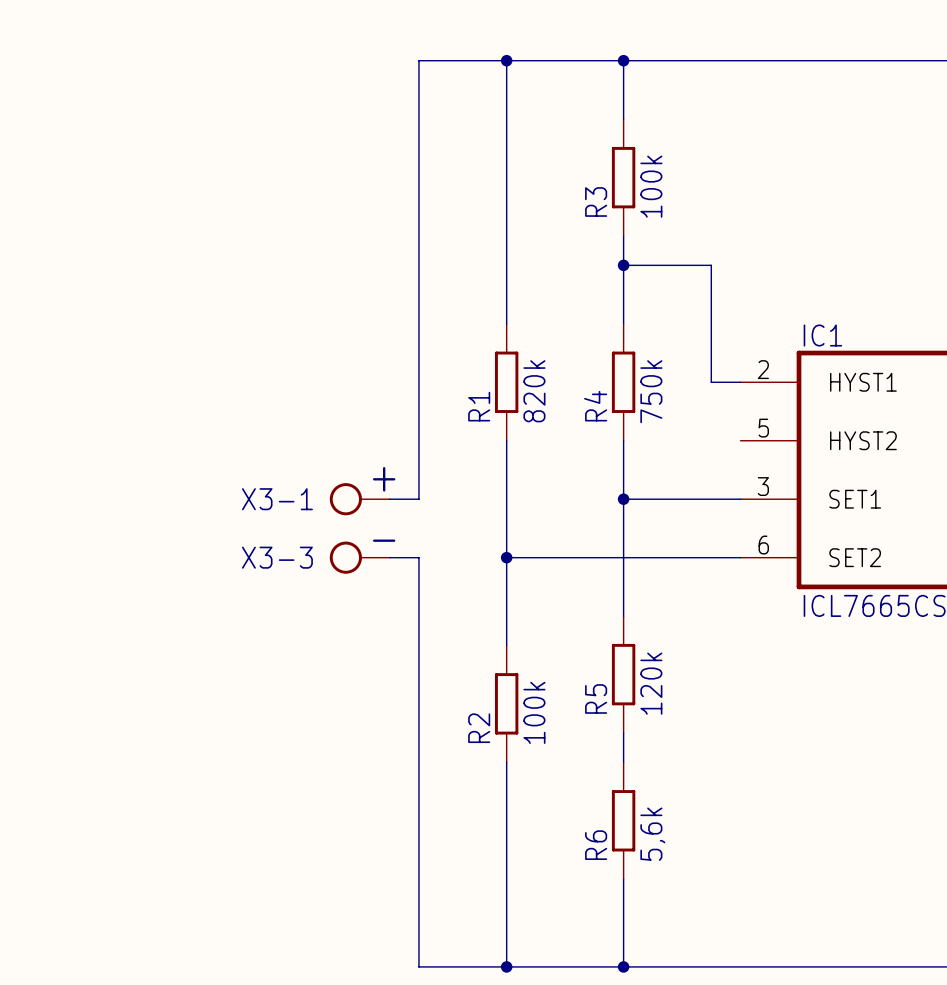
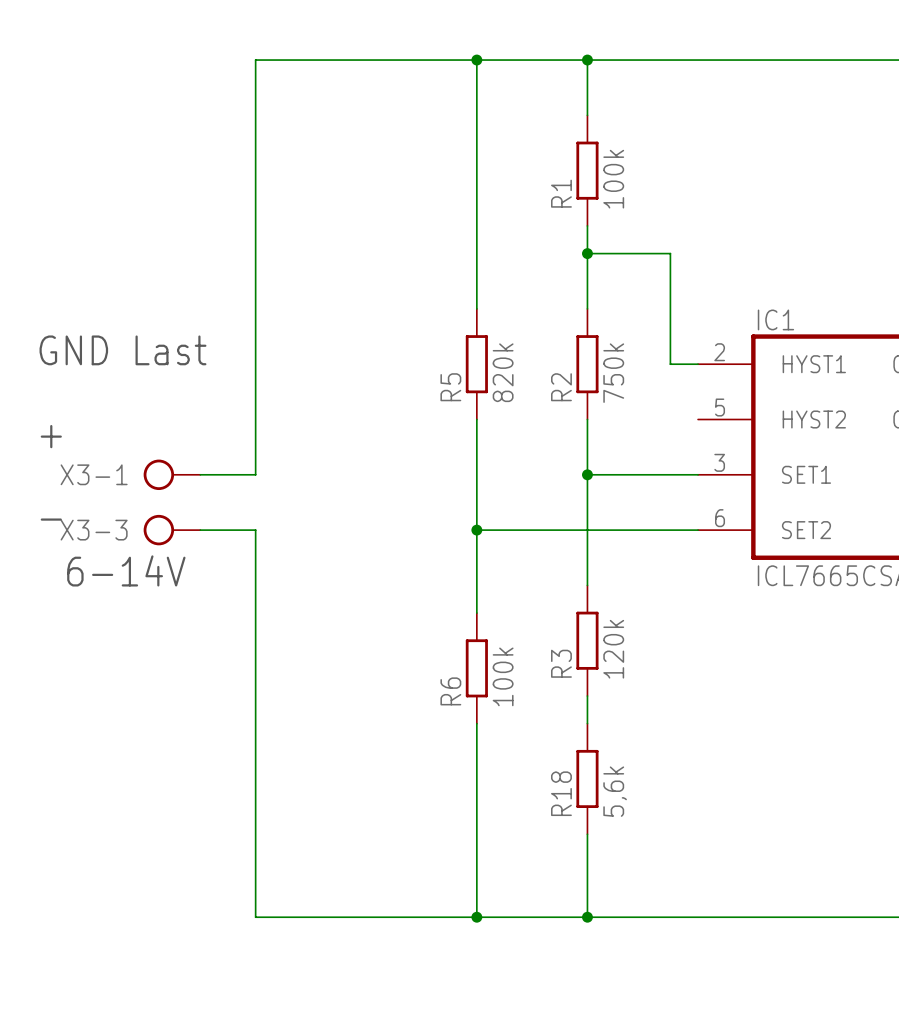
wire: (418, 60) (418, 499) (389, 499) -> (393, 60) (255, 60) (255, 474) (200, 474)
R3 name: R3 (596, 201) -> R1 (561, 193)
text: none -> GND Last (122, 350)
R1 name: R1 (479, 406) -> R5 (450, 387)
R4 name: R4 (595, 406) -> R2 (561, 387)
text: none -> + (51, 436)
text: + (384, 479) -> none
X3-1 position: (359, 499) -> (171, 474)
text: - (384, 540) -> none
text: none -> - (51, 519)
X3-3 position: (359, 557) -> (171, 530)
wire: (389, 557) (418, 557) (418, 966) -> (200, 530) (255, 530) (255, 917) (393, 917)
text: none -> 6-14V (126, 570)
R5 name: R5 (596, 698) -> R3 (561, 663)
R2 name: R2 (479, 728) -> R6 (450, 691)
R6 name: R6 (596, 845) -> R18 (561, 793)

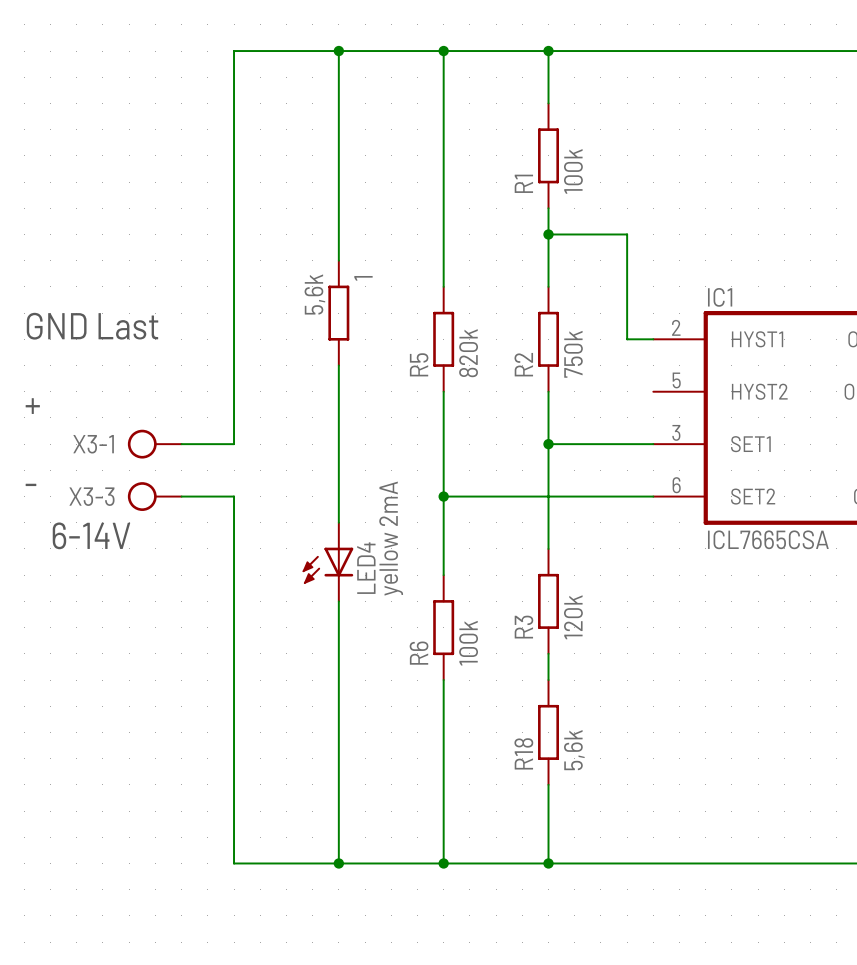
wire: none -> (338, 51) (338, 260)
junction: none -> (338, 51)
1: none -> 5,6k (338, 313)
wire: none -> (338, 365) (338, 522)
LED4: none -> yellow 2mA (327, 562)
wire: none -> (338, 601) (338, 863)
junction: none -> (338, 863)

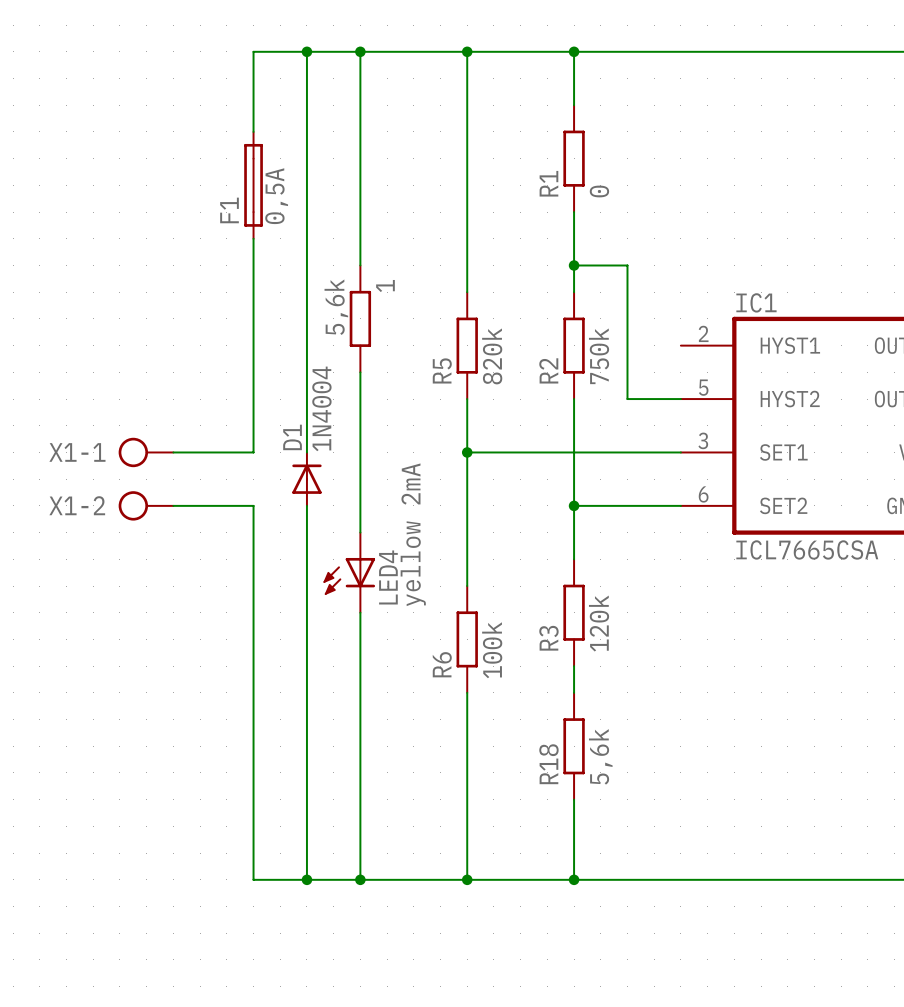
wire: none -> (306, 51) (306, 452)
junction: none -> (306, 51)
R1 value: 100k (573, 171) -> 0 (599, 191)
F1: none -> 0,5A (253, 185)
wire: (548, 234) (627, 234) (627, 339) (653, 339) -> none
junction position: (548, 234) -> (574, 265)
wire: none -> (574, 265) (627, 265) (627, 399) (680, 399)
text: GND Last (92, 326) -> none
text: + (32, 406) -> none
X1-1: none -> (146, 452)
X3-1: (154, 444) -> none
junction: none -> (467, 452)
junction: (548, 444) -> none
D1: none -> 1N4004 (306, 479)
text: - (30, 484) -> none
X1-2: none -> (146, 505)
X3-3: (154, 496) -> none
wire: none -> (306, 505) (306, 879)
wire: (443, 496) (548, 496) -> (467, 452) (574, 452)
junction: (443, 496) -> none
junction: none -> (574, 505)
text: 6-14V (91, 535) -> none
junction: none -> (306, 879)

